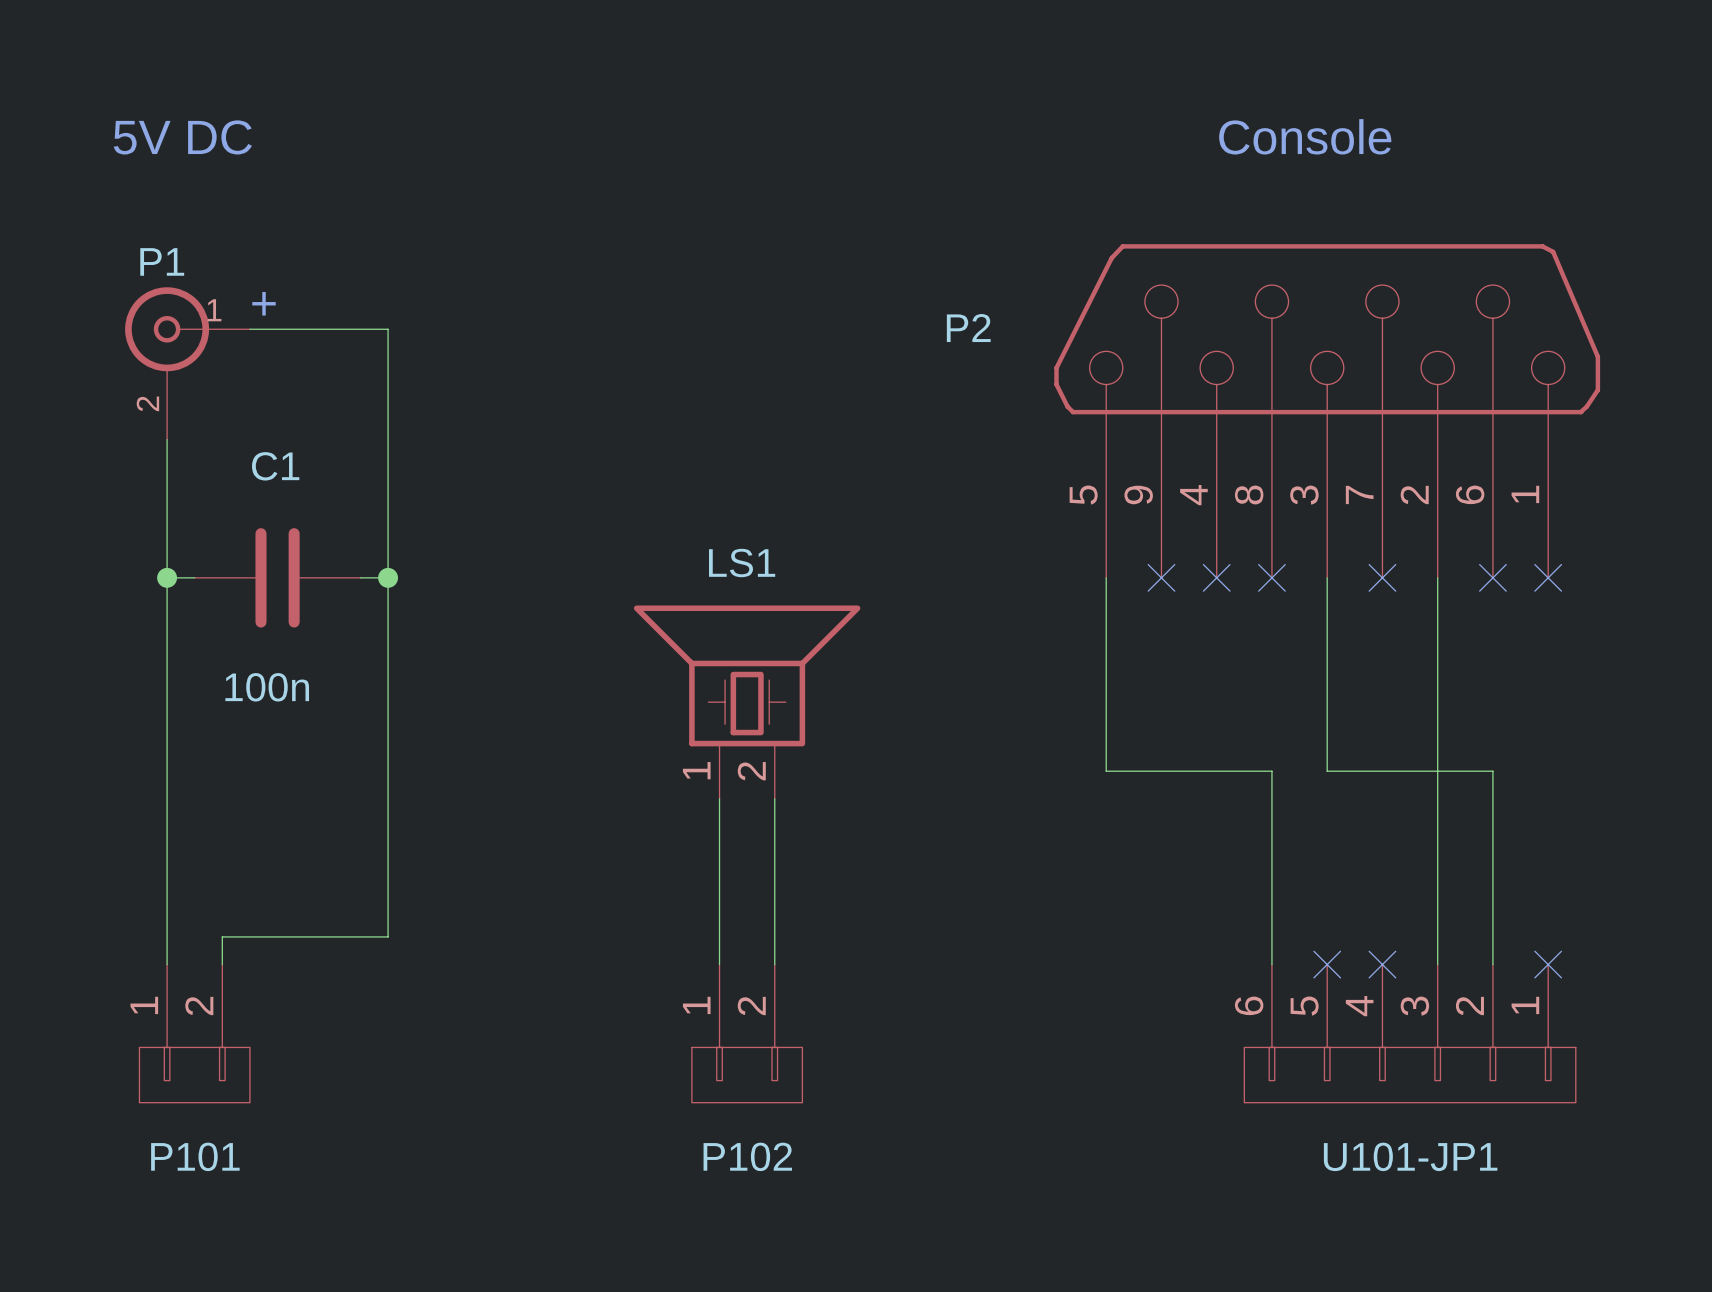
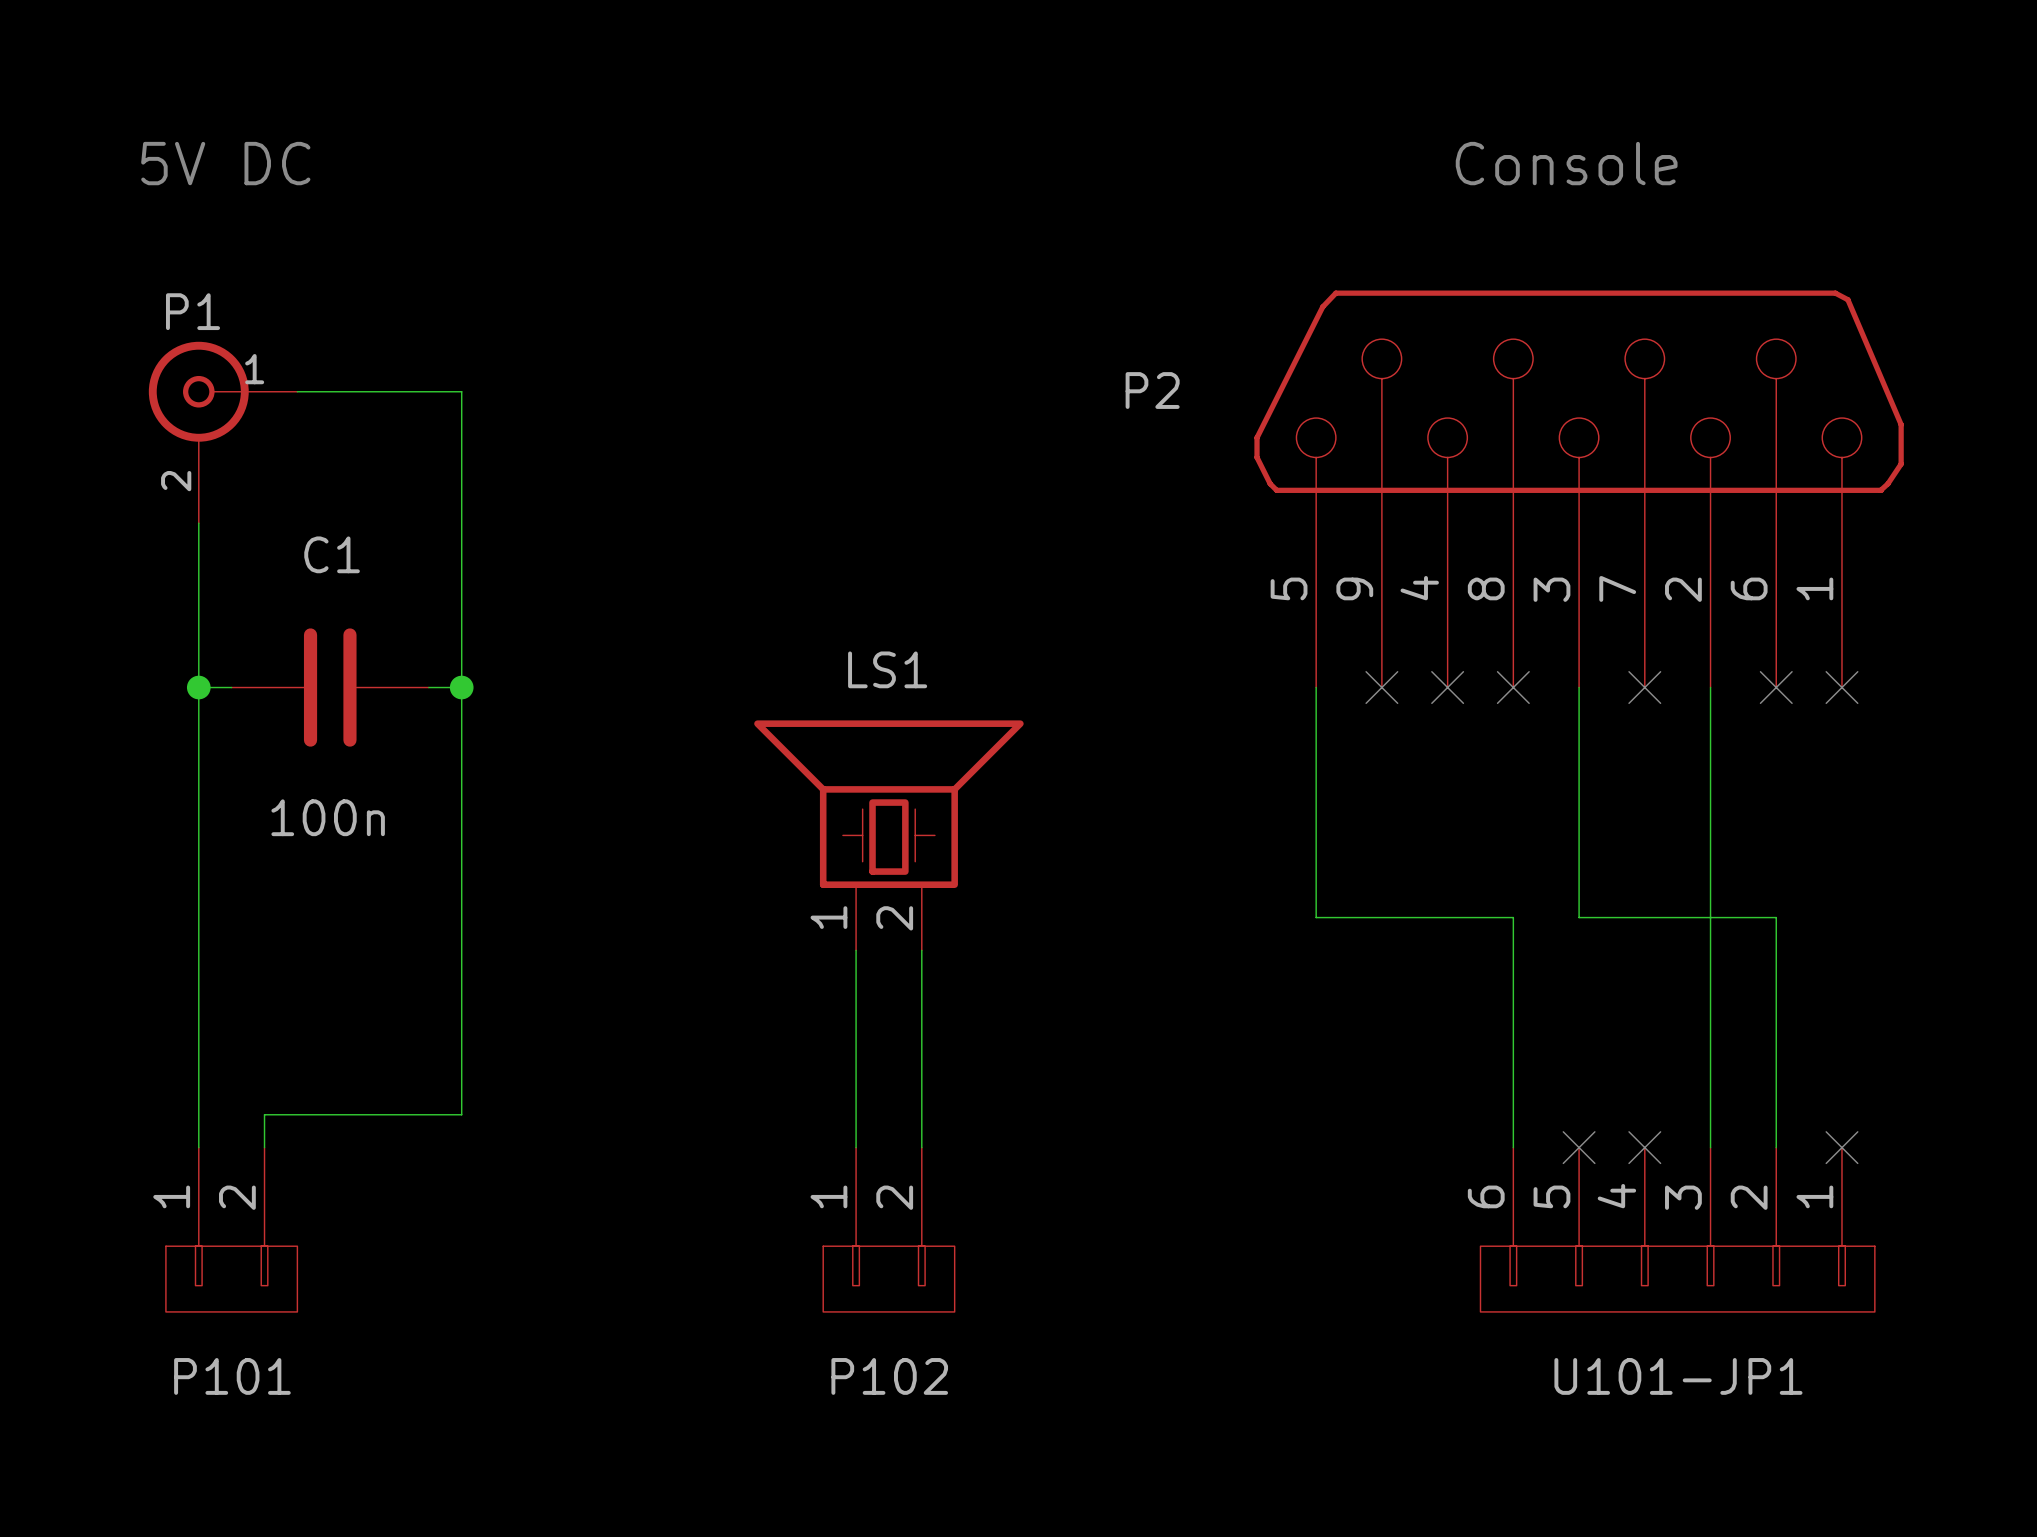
text: + (264, 303) -> none

